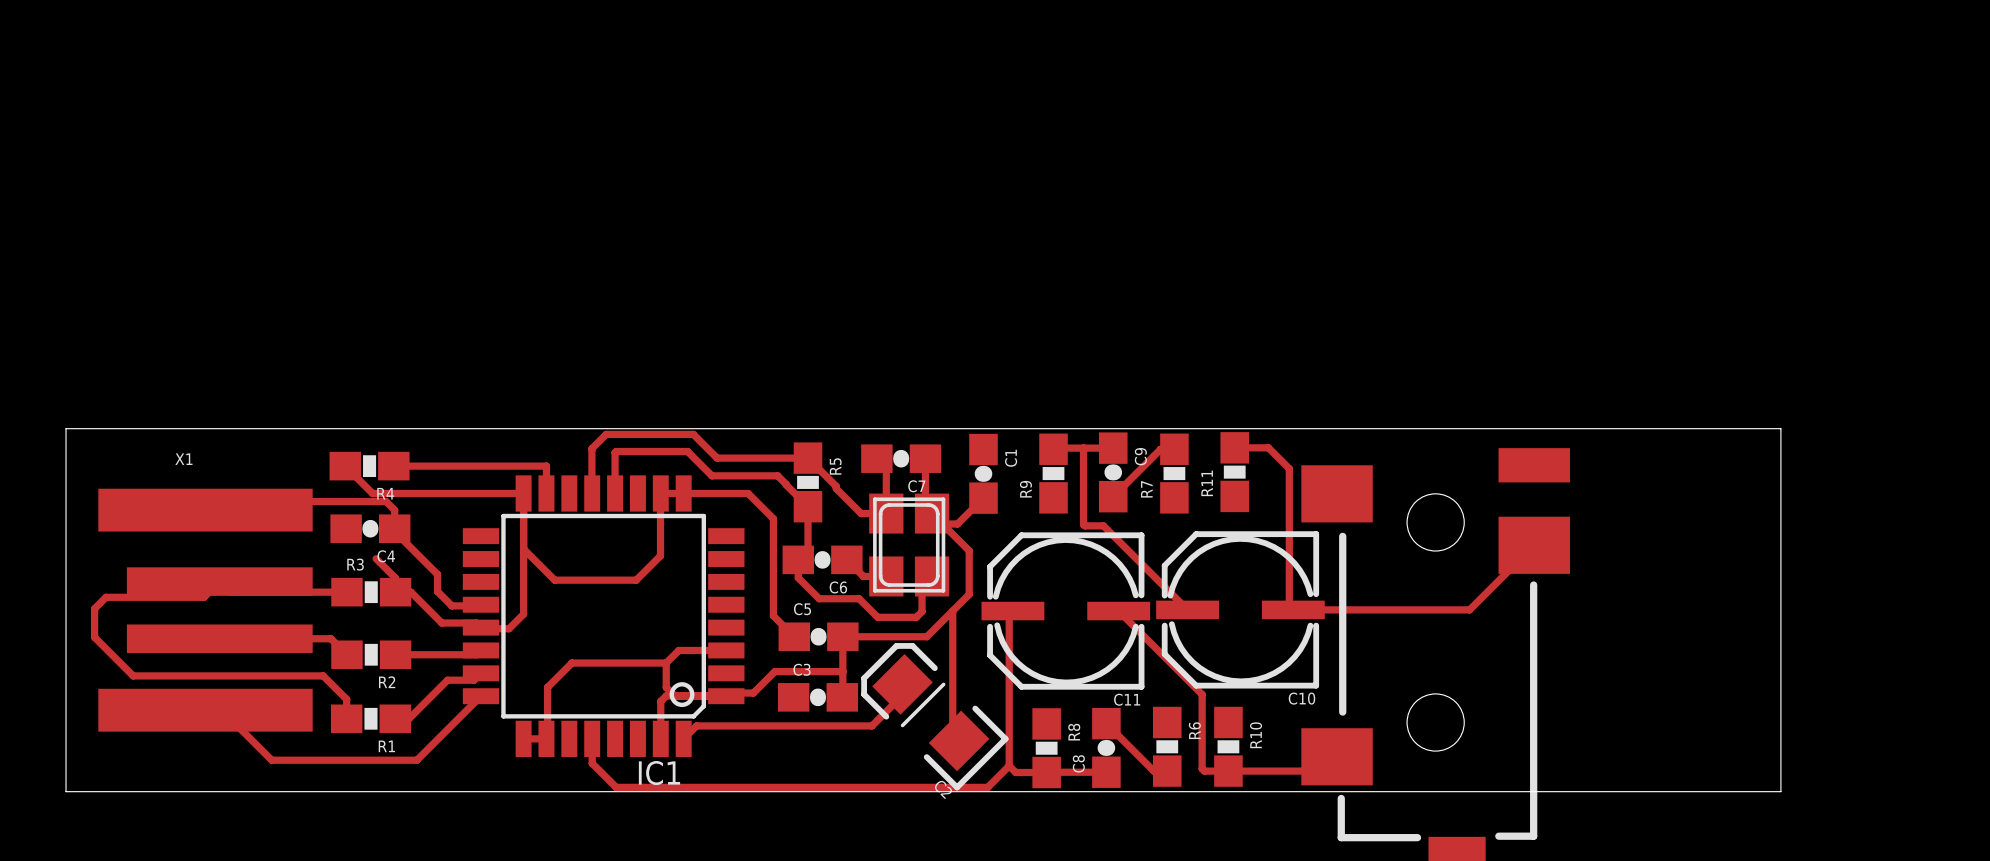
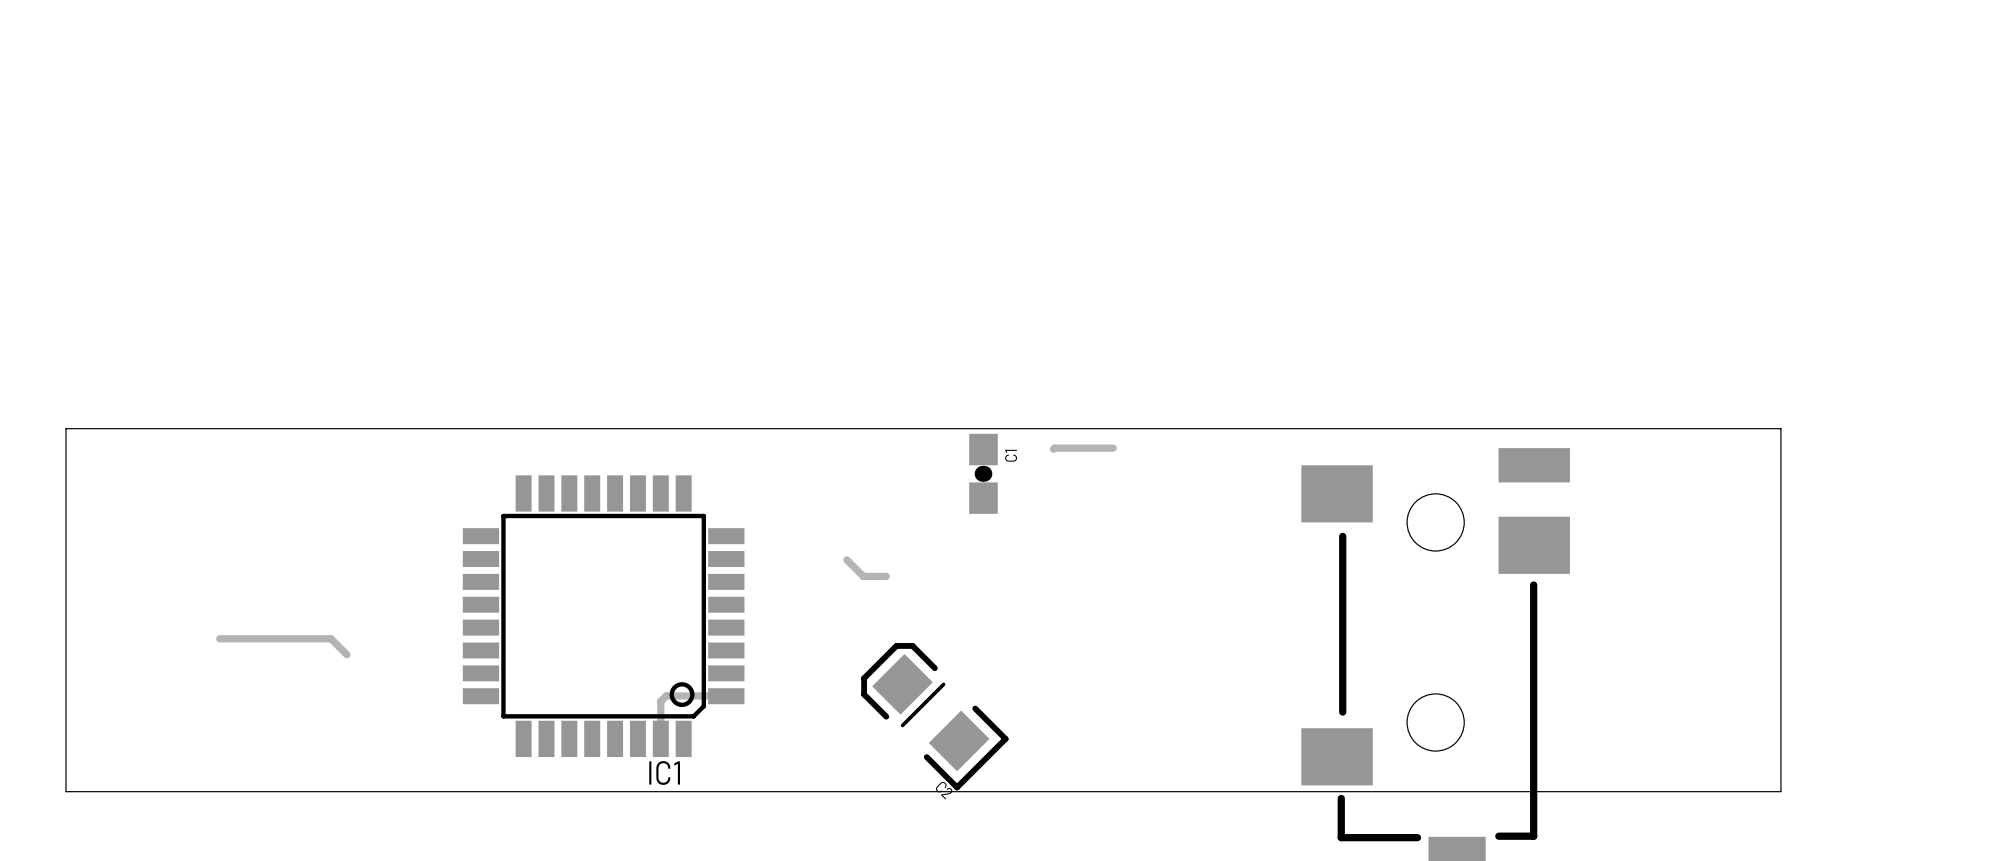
track: (1234, 447) (1268, 447) (1289, 468) (1289, 605) (1293, 609) (1469, 609) (1534, 545) -> none
track: (1083, 448) (1083, 524) (1103, 525) (1187, 609) -> none
track: (1174, 449) (1160, 449) (1113, 496) -> none
track: (876, 458) (886, 468) (886, 513) (861, 513) (808, 458) (717, 458) (693, 434) (606, 434) (591, 448) (591, 493) -> none
C7: (901, 458) -> none
track: (925, 458) (925, 506) (969, 550) (969, 594) (926, 636) (842, 636) (842, 697) -> none
track: (345, 466) (372, 493) (523, 493) (523, 614) (509, 628) (482, 628) (476, 623) (441, 623) (410, 592) (395, 592) (395, 578) (376, 558) -> none
R4: (369, 466) -> none
track: (393, 466) (546, 466) (546, 493) -> none
C9: (1113, 472) -> none
R11: (1234, 472) -> none
R9: (1053, 473) -> none
R7: (1174, 473) -> none
R5: (808, 482) -> none
track: (786, 484) (777, 475) (711, 475) (687, 451) (616, 451) (615, 493) -> none
track: (786, 484) (808, 506) (808, 550) (798, 559) (798, 577) (819, 598) (859, 598) (877, 617) (916, 617) (922, 611) (922, 586) (932, 576) -> none
track: (660, 493) (748, 493) (773, 518) (773, 615) (794, 636) -> none
track: (660, 493) (660, 555) (636, 580) (554, 580) (523, 549) -> none
track: (983, 498) (957, 524) (942, 524) -> none
track: (205, 510) (208, 513) (288, 513) (300, 501) (386, 501) (394, 510) (394, 531) (437, 574) (437, 591) (451, 605) (480, 604) -> none
C4: (370, 528) -> none
part: (909, 545) -> none
C6: (822, 559) -> none
track: (346, 592) (230, 592) (219, 581) (204, 597) (106, 597) (94, 608) (94, 637) (133, 675) (323, 675) (346, 699) (346, 718) -> none
R3: (371, 592) -> none
C10: (1240, 609) -> none
X1: (205, 610) -> none
track: (952, 610) (952, 734) (959, 740) -> none
track: (1012, 611) (1009, 614) (1009, 765) -> none
C11: (1065, 611) -> none
track: (1118, 611) (1202, 694) (1202, 768) (1204, 771) (1322, 771) (1337, 756) -> none
C5: (818, 636) -> none
track: (480, 650) (476, 654) (395, 654) -> none
track: (726, 650) (678, 650) (666, 663) -> none
R2: (371, 654) -> none
track: (666, 663) (666, 687) (675, 696) (726, 696) (729, 693) (753, 693) (774, 671) (842, 671) -> none
track: (666, 663) (571, 663) (547, 687) (547, 737) (523, 738) -> none
track: (480, 673) (474, 680) (447, 680) (408, 718) (395, 718) -> none
track: (902, 684) (902, 695) (872, 725) (696, 725) (683, 738) -> none
track: (480, 696) (416, 760) (271, 760) (221, 710) (205, 710) -> none
C3: (818, 697) -> none
R1: (370, 718) -> none
track: (1106, 723) (1153, 771) (1167, 771) -> none
track: (592, 738) (592, 763) (616, 787) (987, 787) (1009, 765) -> none
R6: (1167, 746) -> none
R10: (1228, 746) -> none
C8: (1106, 747) -> none
R8: (1046, 748) -> none
track: (1009, 765) (1015, 772) (1046, 772) -> none
track: (1046, 772) (1106, 772) -> none

